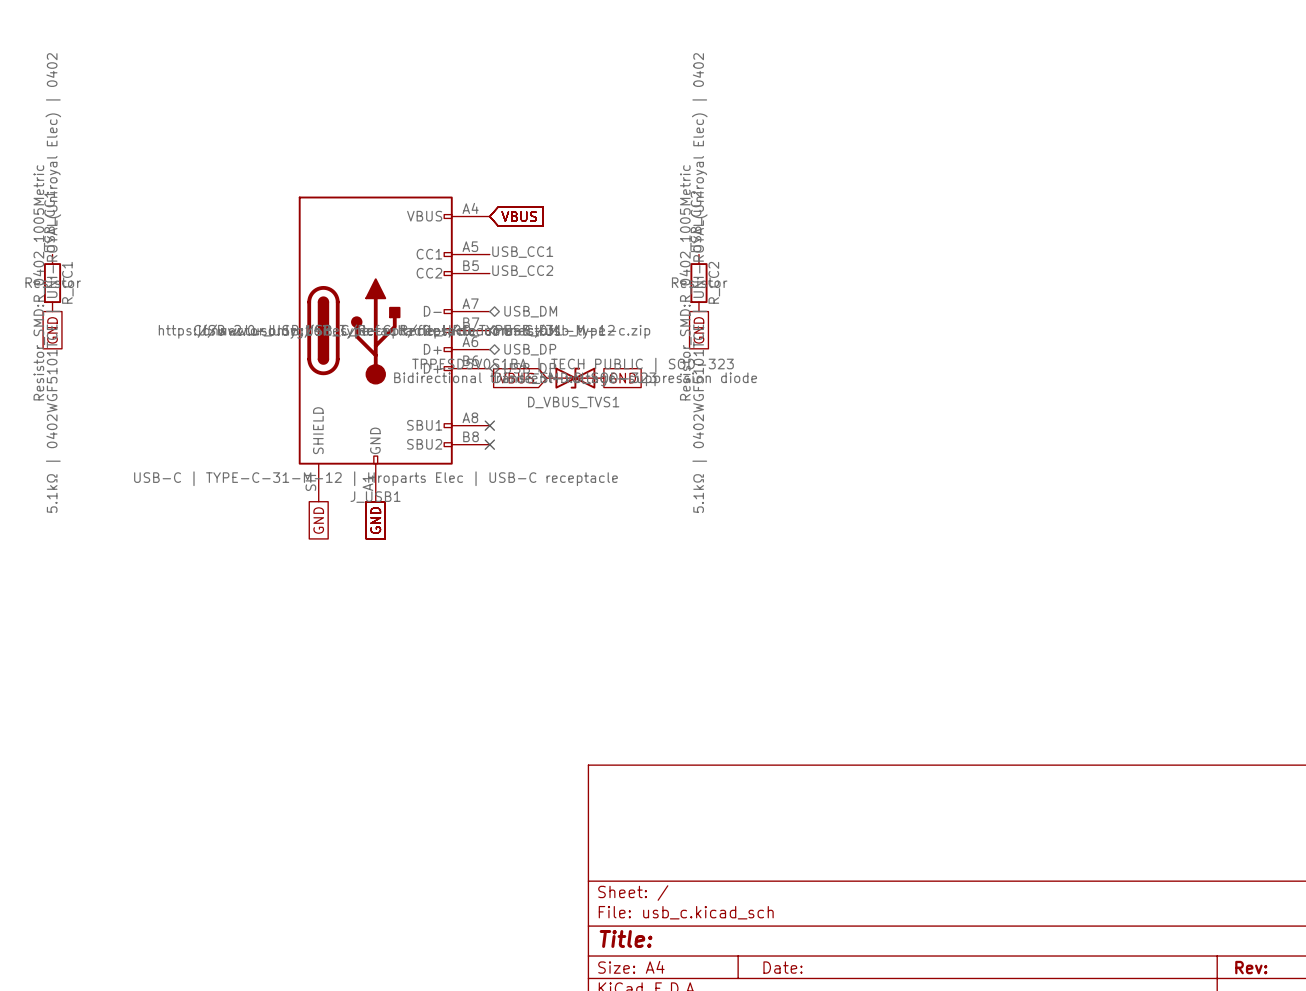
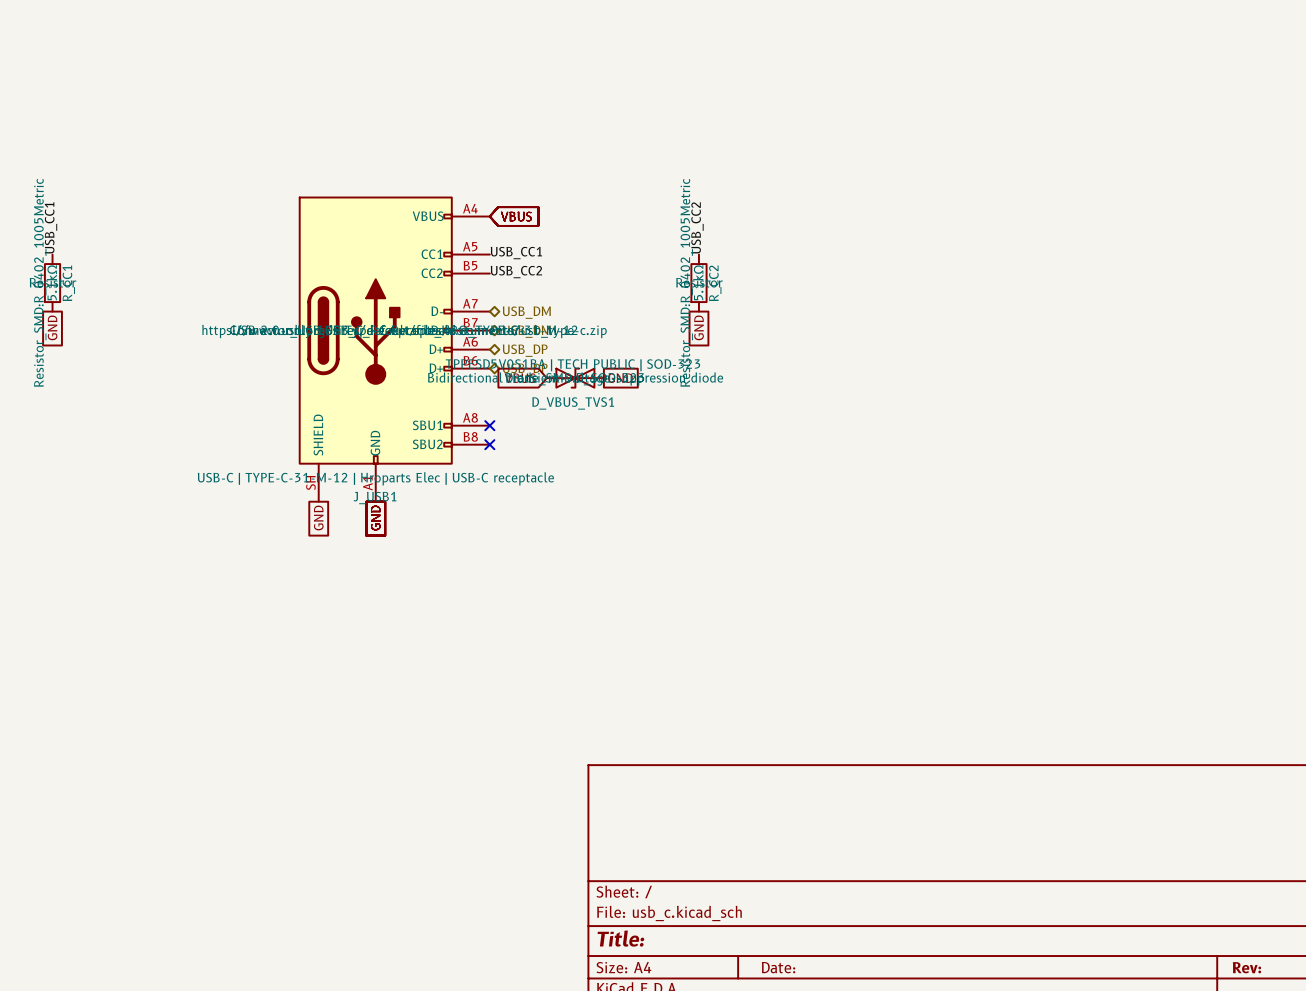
R_CC1 value: 5.1kΩ | 0402WGF5101TCE | UNI-ROYAL(Uniroyal Elec) | 0402 (53, 283) -> 5.1kΩ (51, 282)
R_CC2 value: 5.1kΩ | 0402WGF5101TCE | UNI-ROYAL(Uniroyal Elec) | 0402 (699, 283) -> 5.1kΩ (698, 282)

